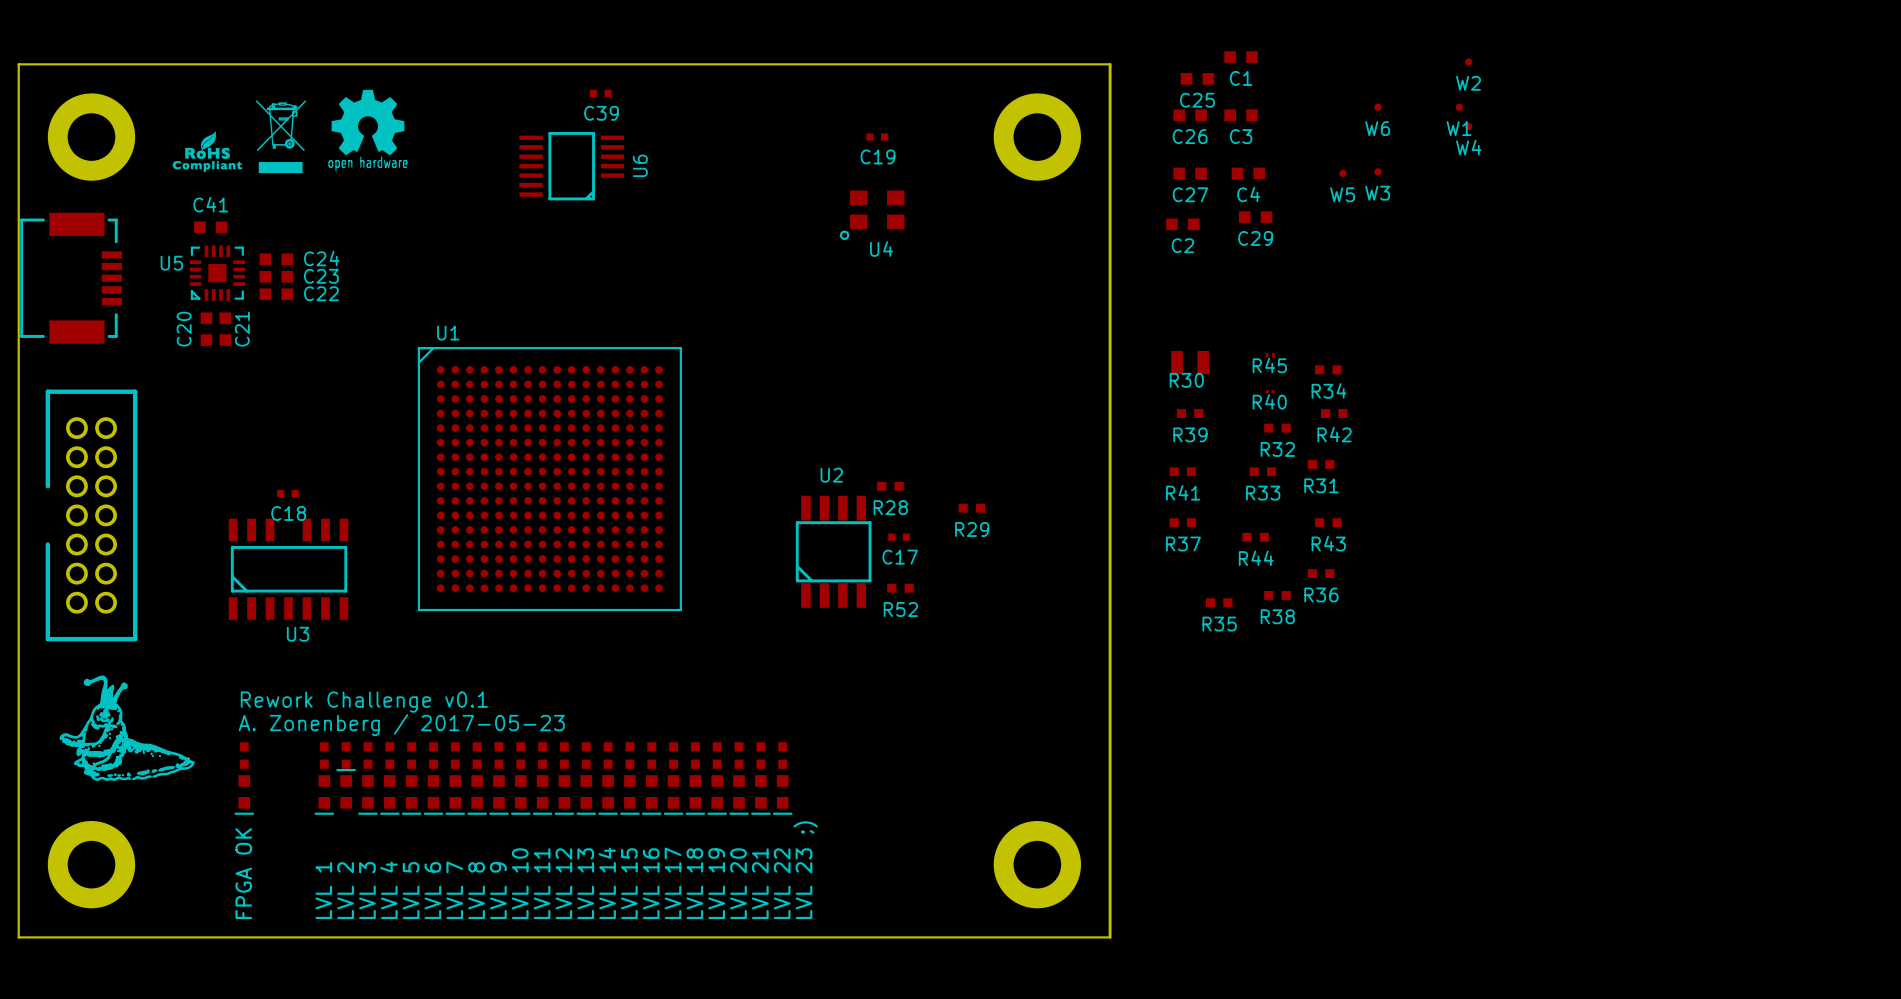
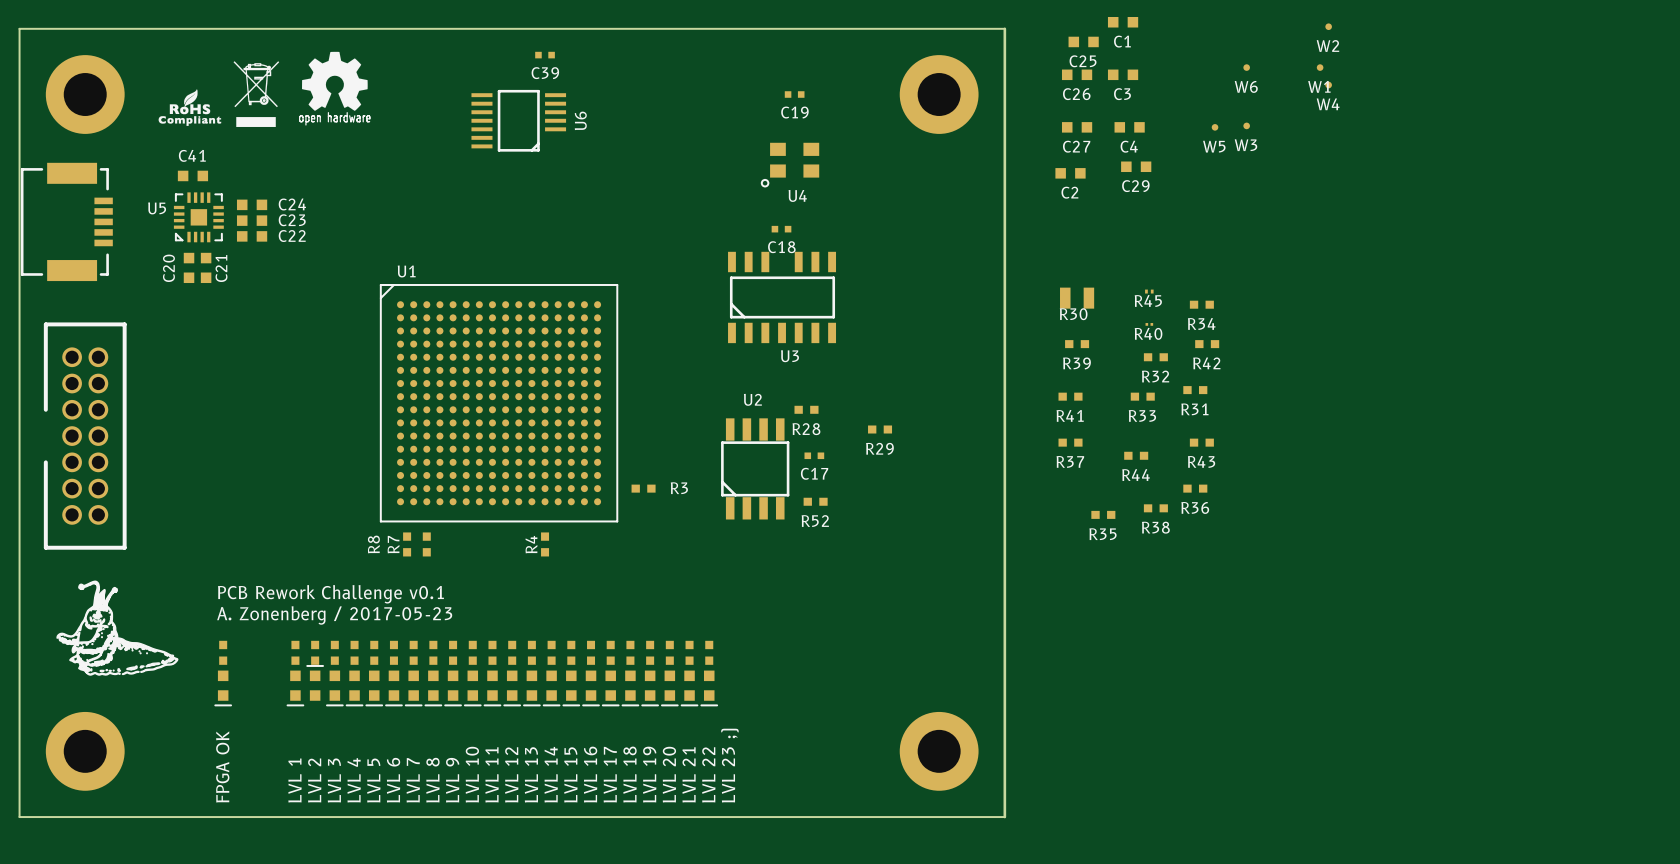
C18 position: (287, 493) -> (781, 229)
U3 position: (288, 569) -> (782, 297)
R3: none -> (643, 488)
R8: none -> (407, 544)
R7: none -> (426, 544)
R4: none -> (545, 544)
text: Rework Challenge v0.1 (364, 702) -> PCB Rework Challenge v0.1 (330, 594)
text position: A. Zonenberg / 2017-05-23 (401, 725) -> A. Zonenberg / 2017-05-23 (334, 615)

